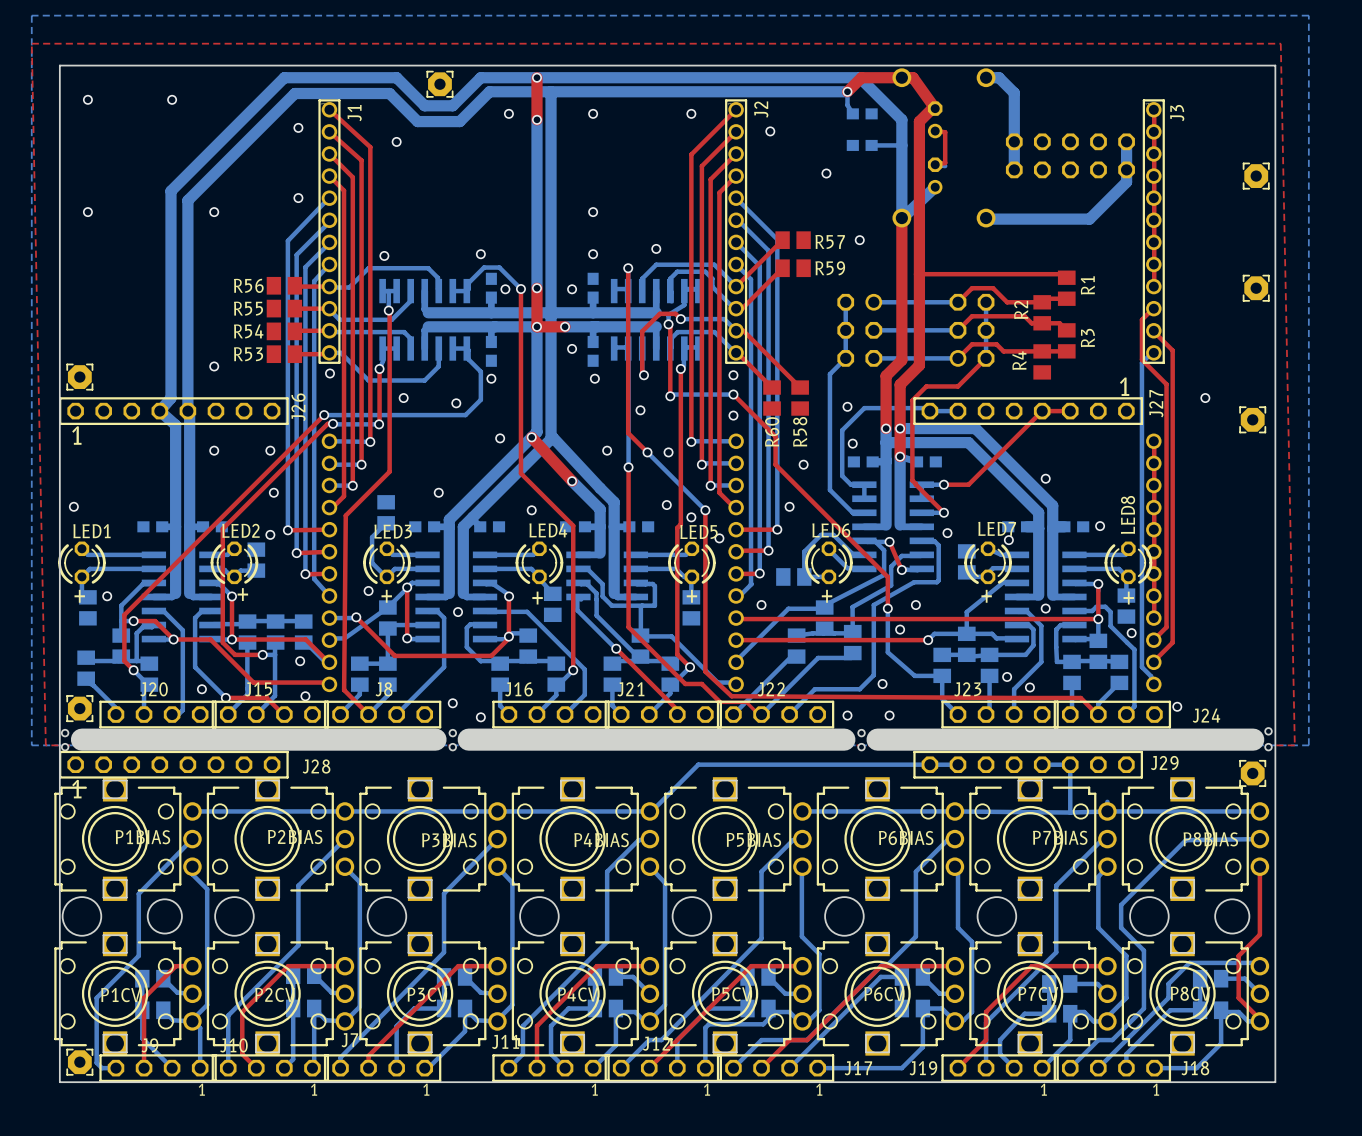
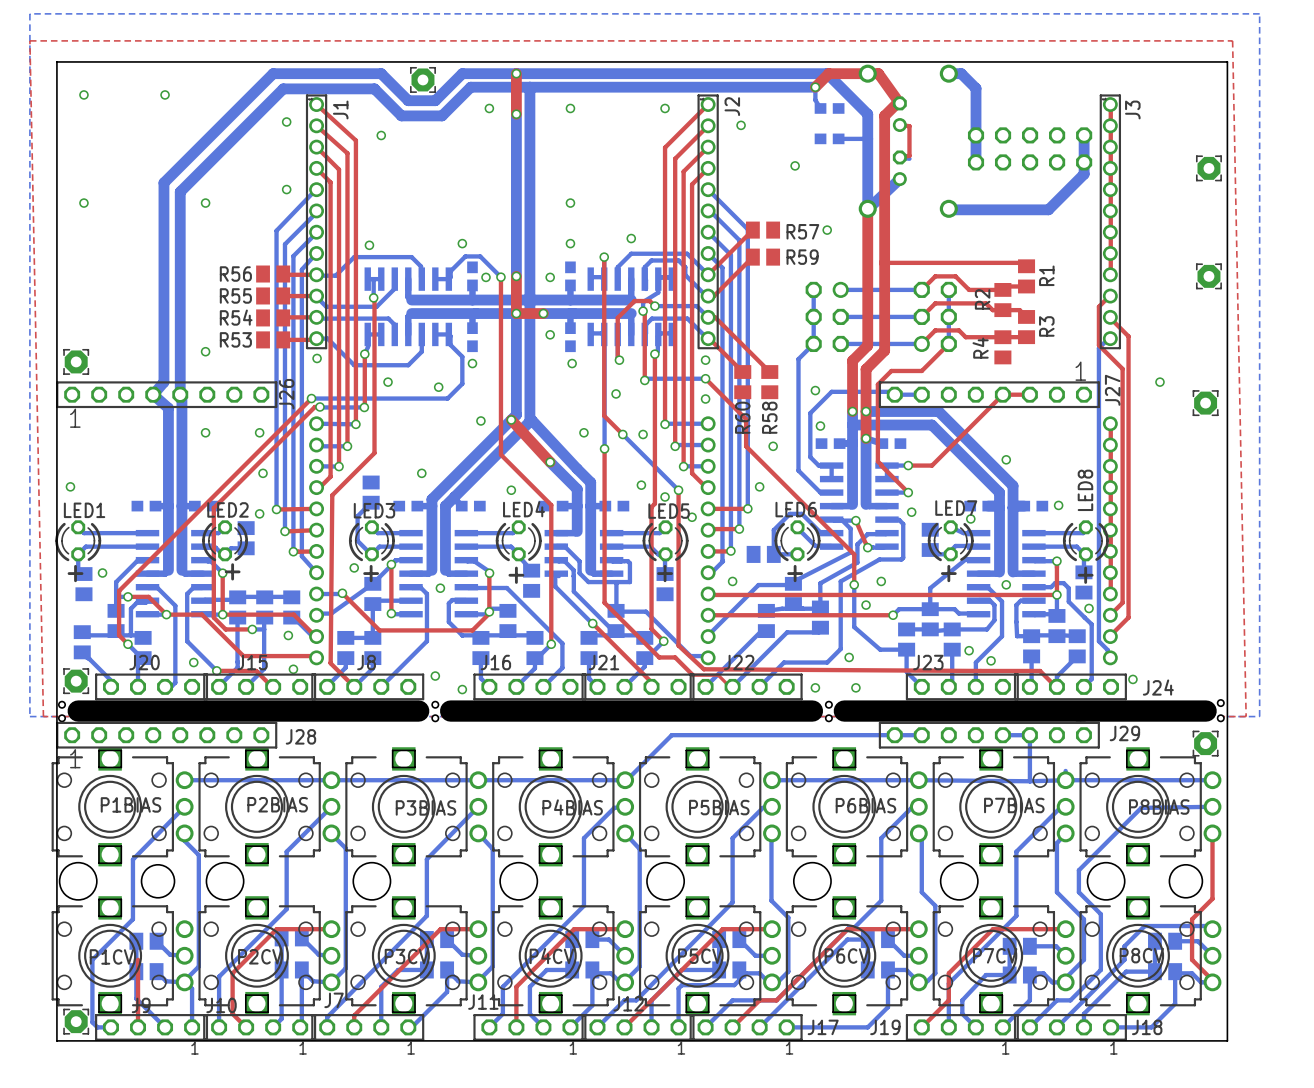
top track: (192, 966) (175, 966) (144, 997) -> none

